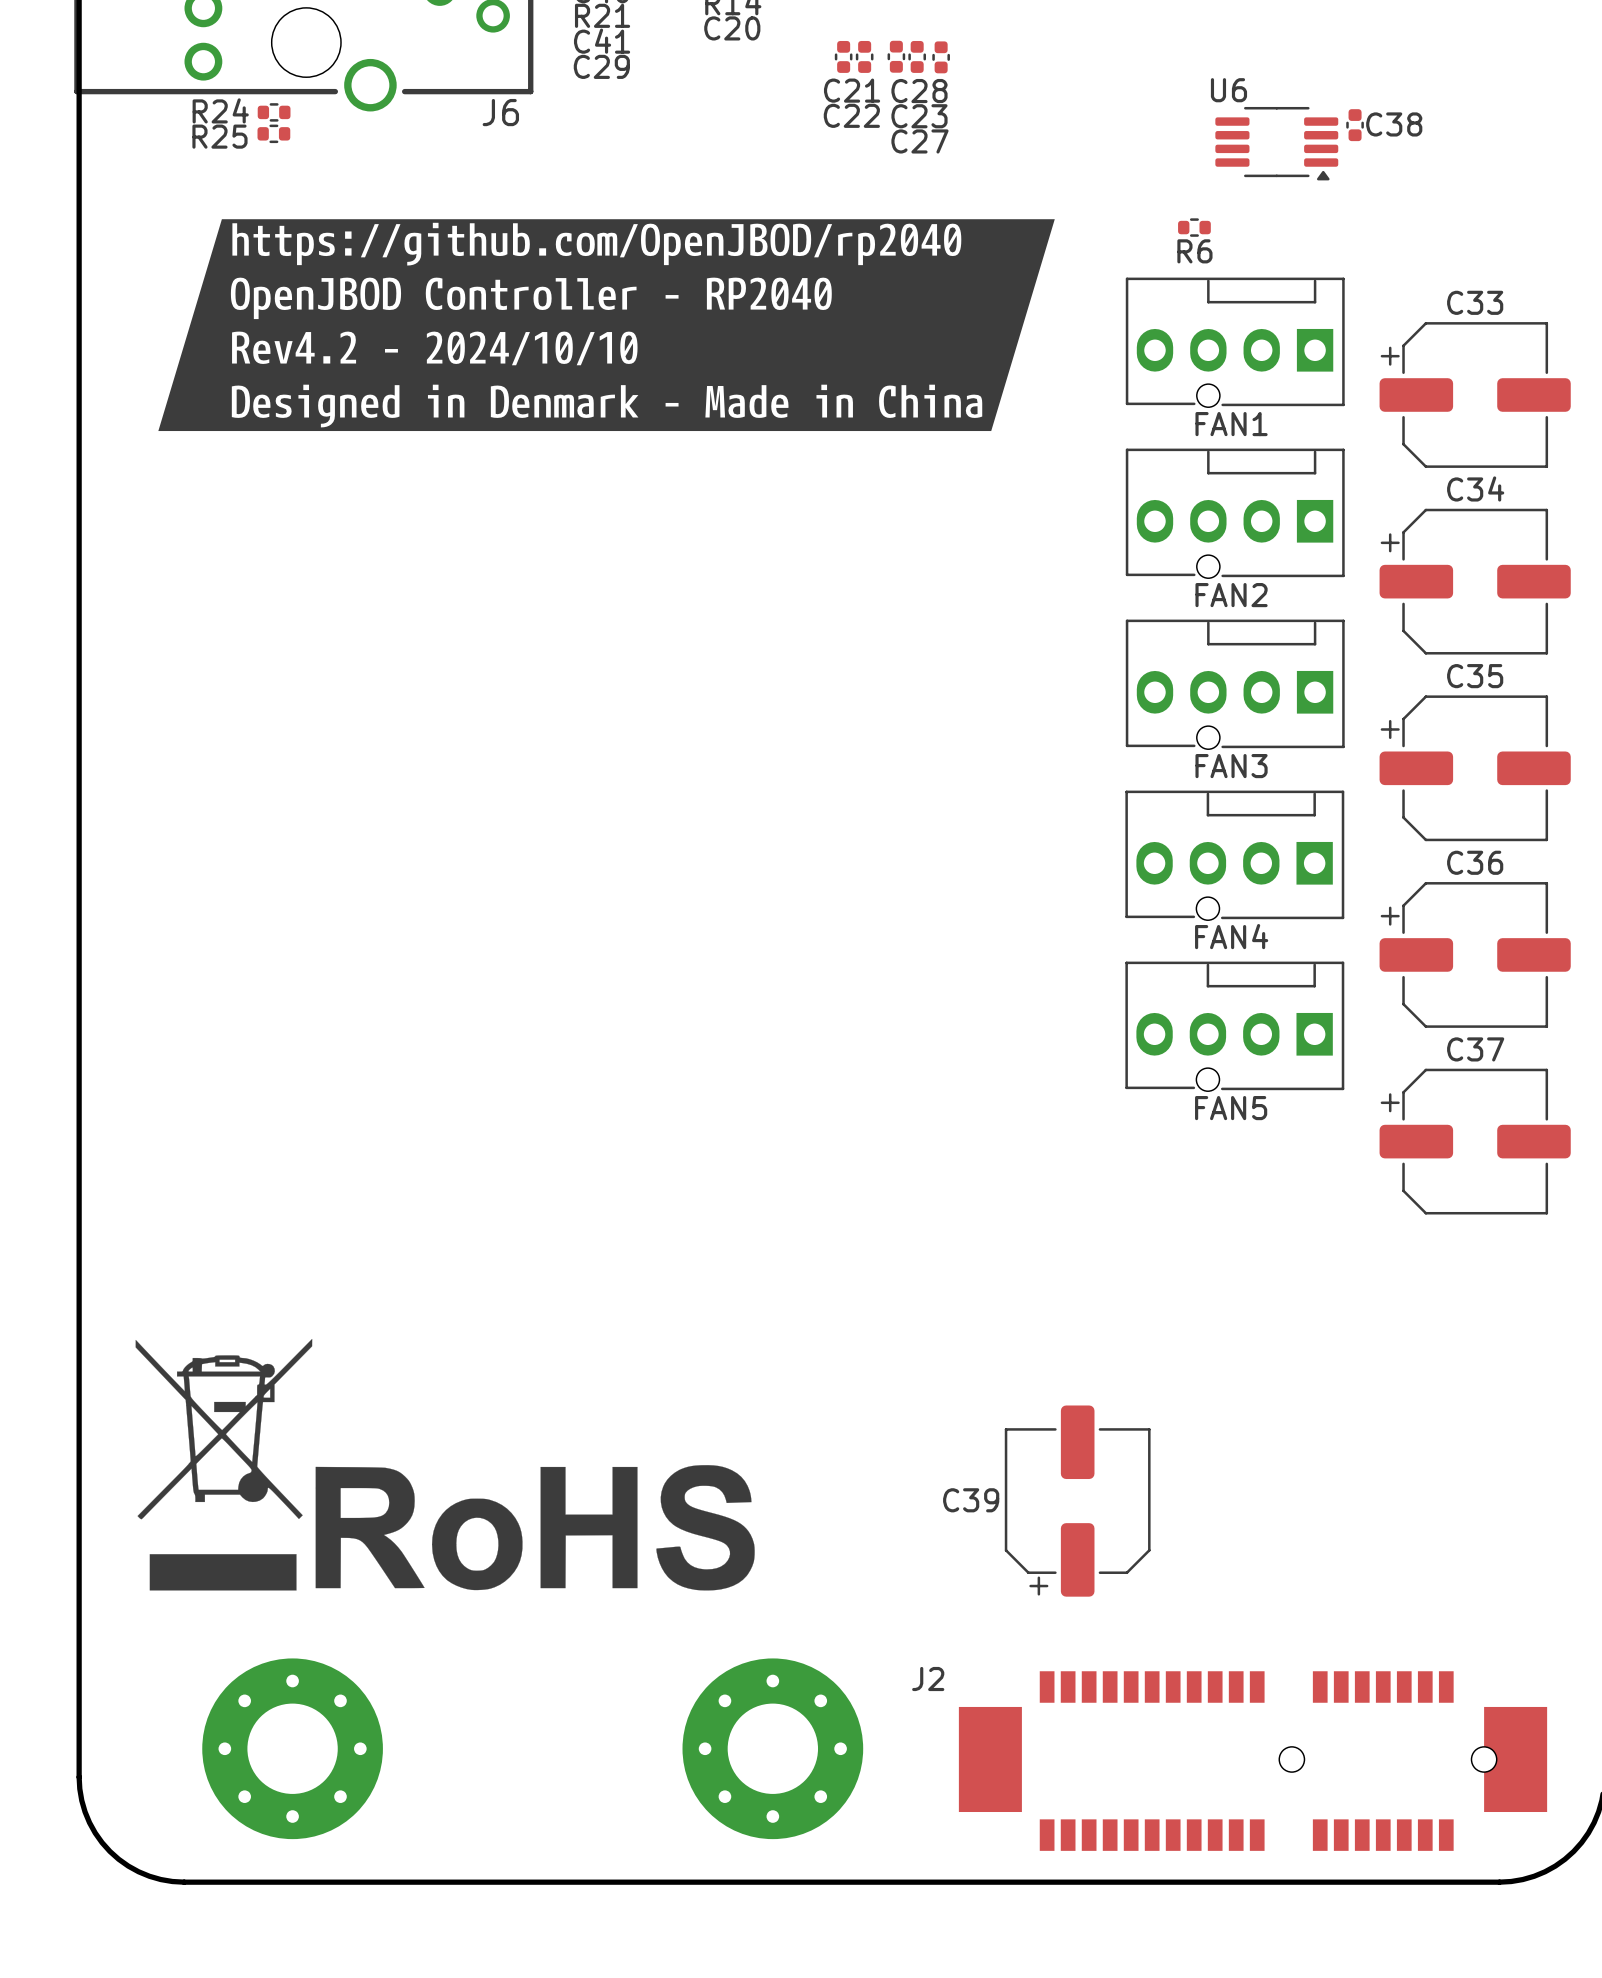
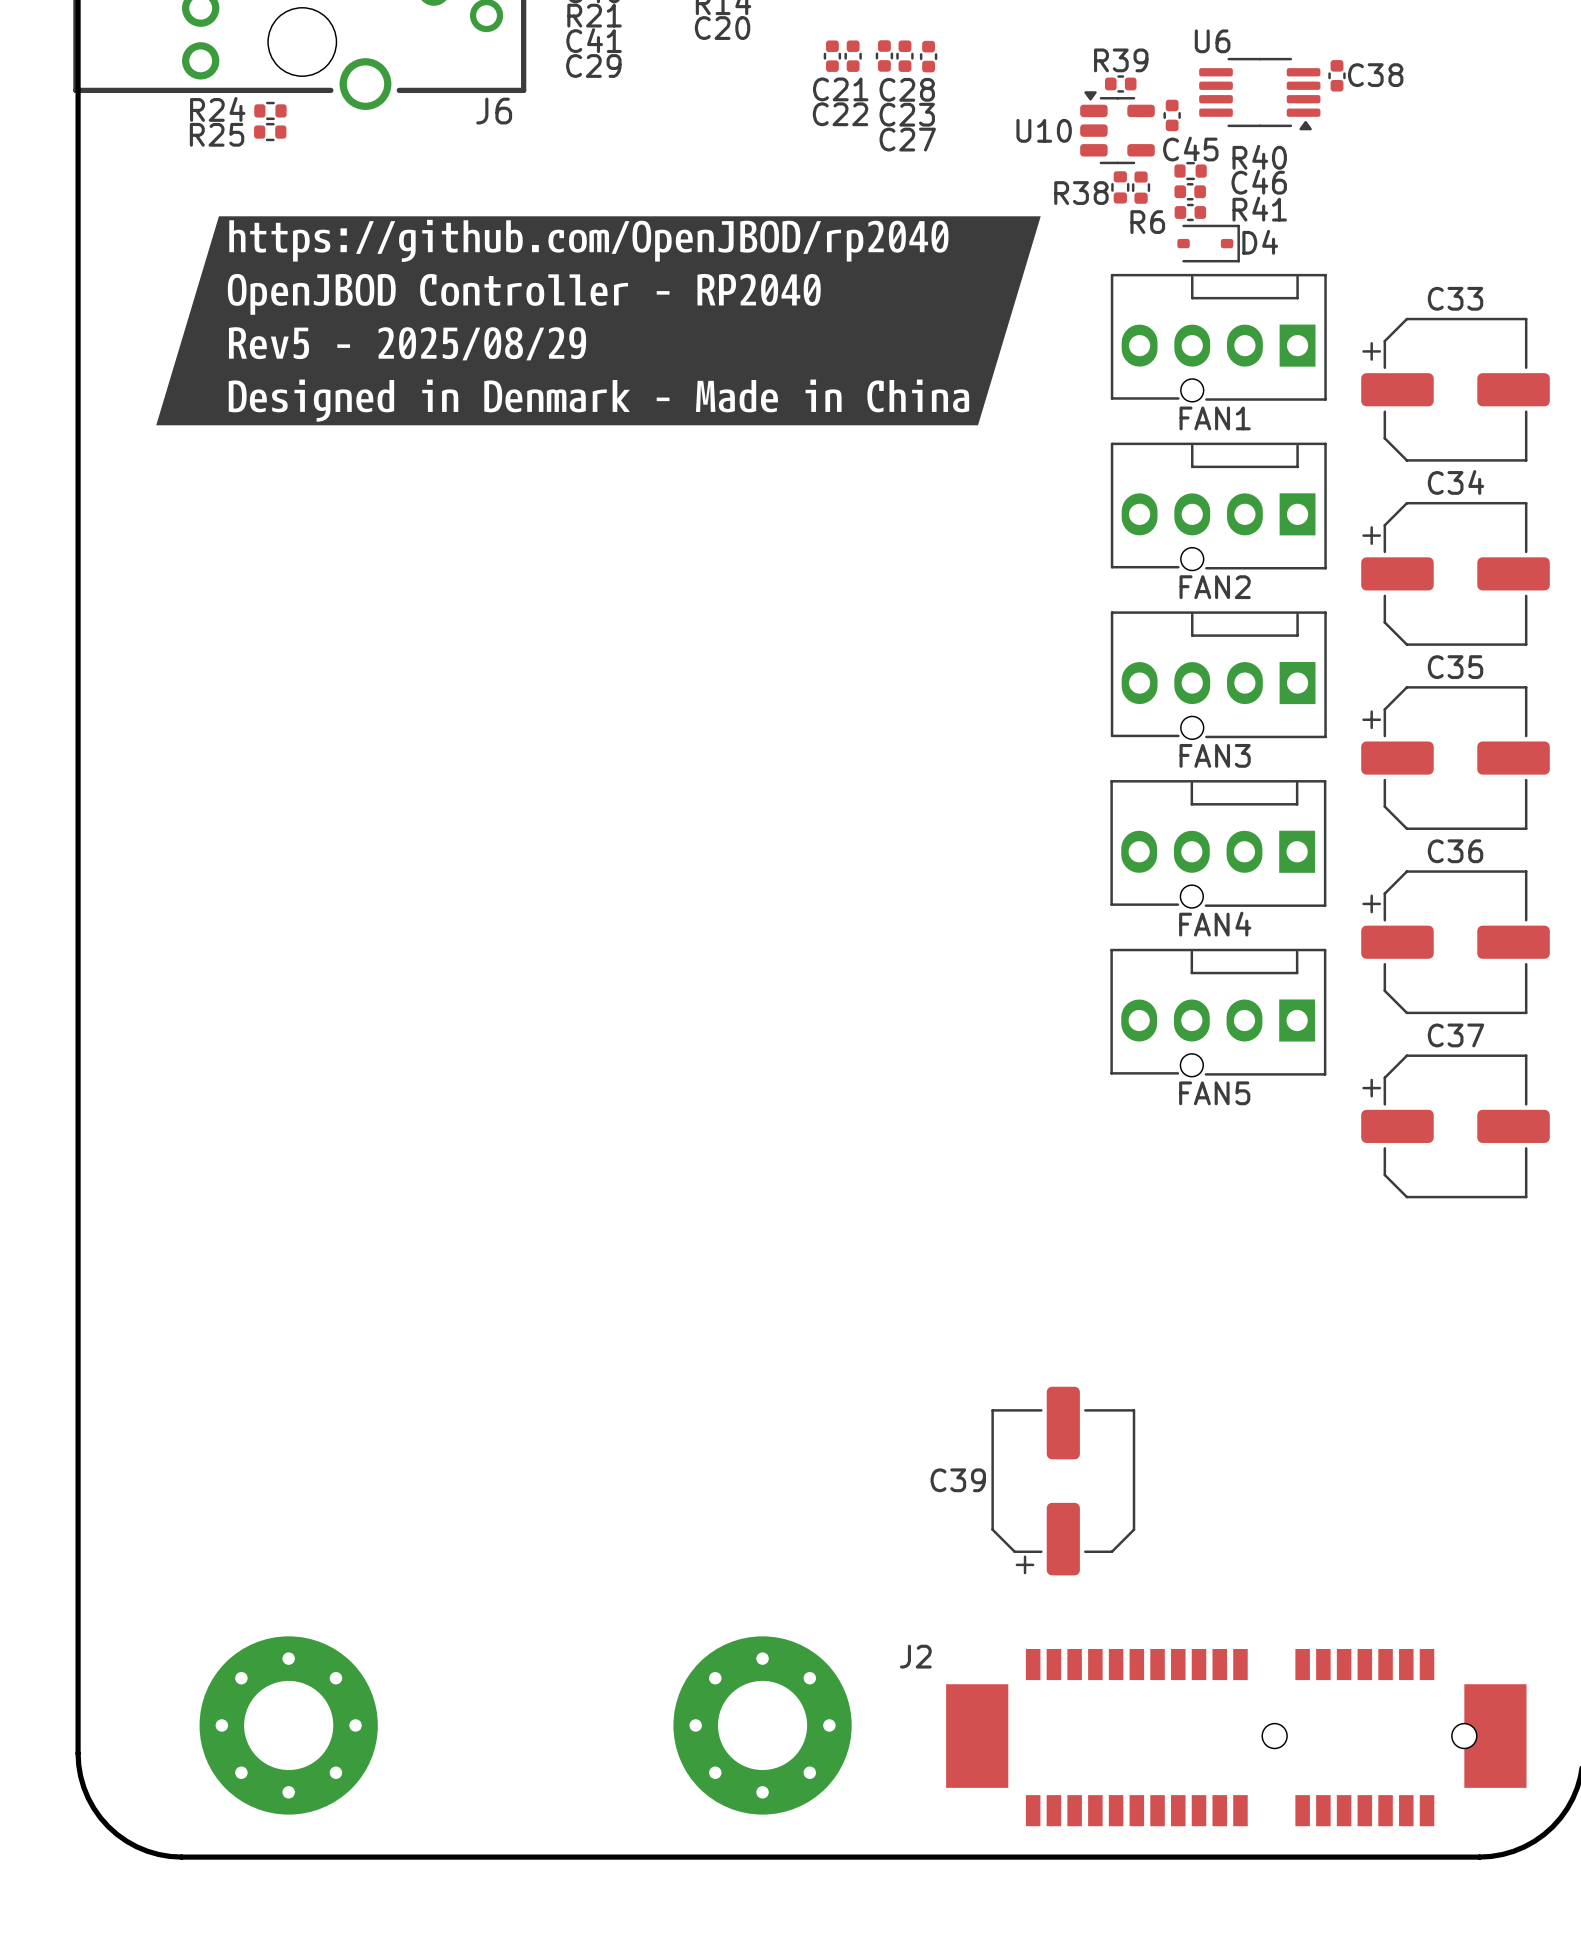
R39: none -> (1120, 83)
C45: none -> (1172, 115)
C38 position: (1355, 125) -> (1337, 75)
U10: none -> (1117, 127)
U6 position: (1276, 143) -> (1259, 94)
R40: none -> (1190, 171)
R38: none -> (1120, 187)
C46: none -> (1190, 191)
R41: none -> (1190, 212)
drawing shape: [158, 219, 1055, 432] -> [156, 216, 1041, 426]
R6 rotation: 0° (1194, 227) -> 90° clockwise (1141, 187)
R6 position: (1194, 227) -> (1141, 187)
D4: none -> (1208, 243)
drawing: [135, 1338, 755, 1591] -> none

